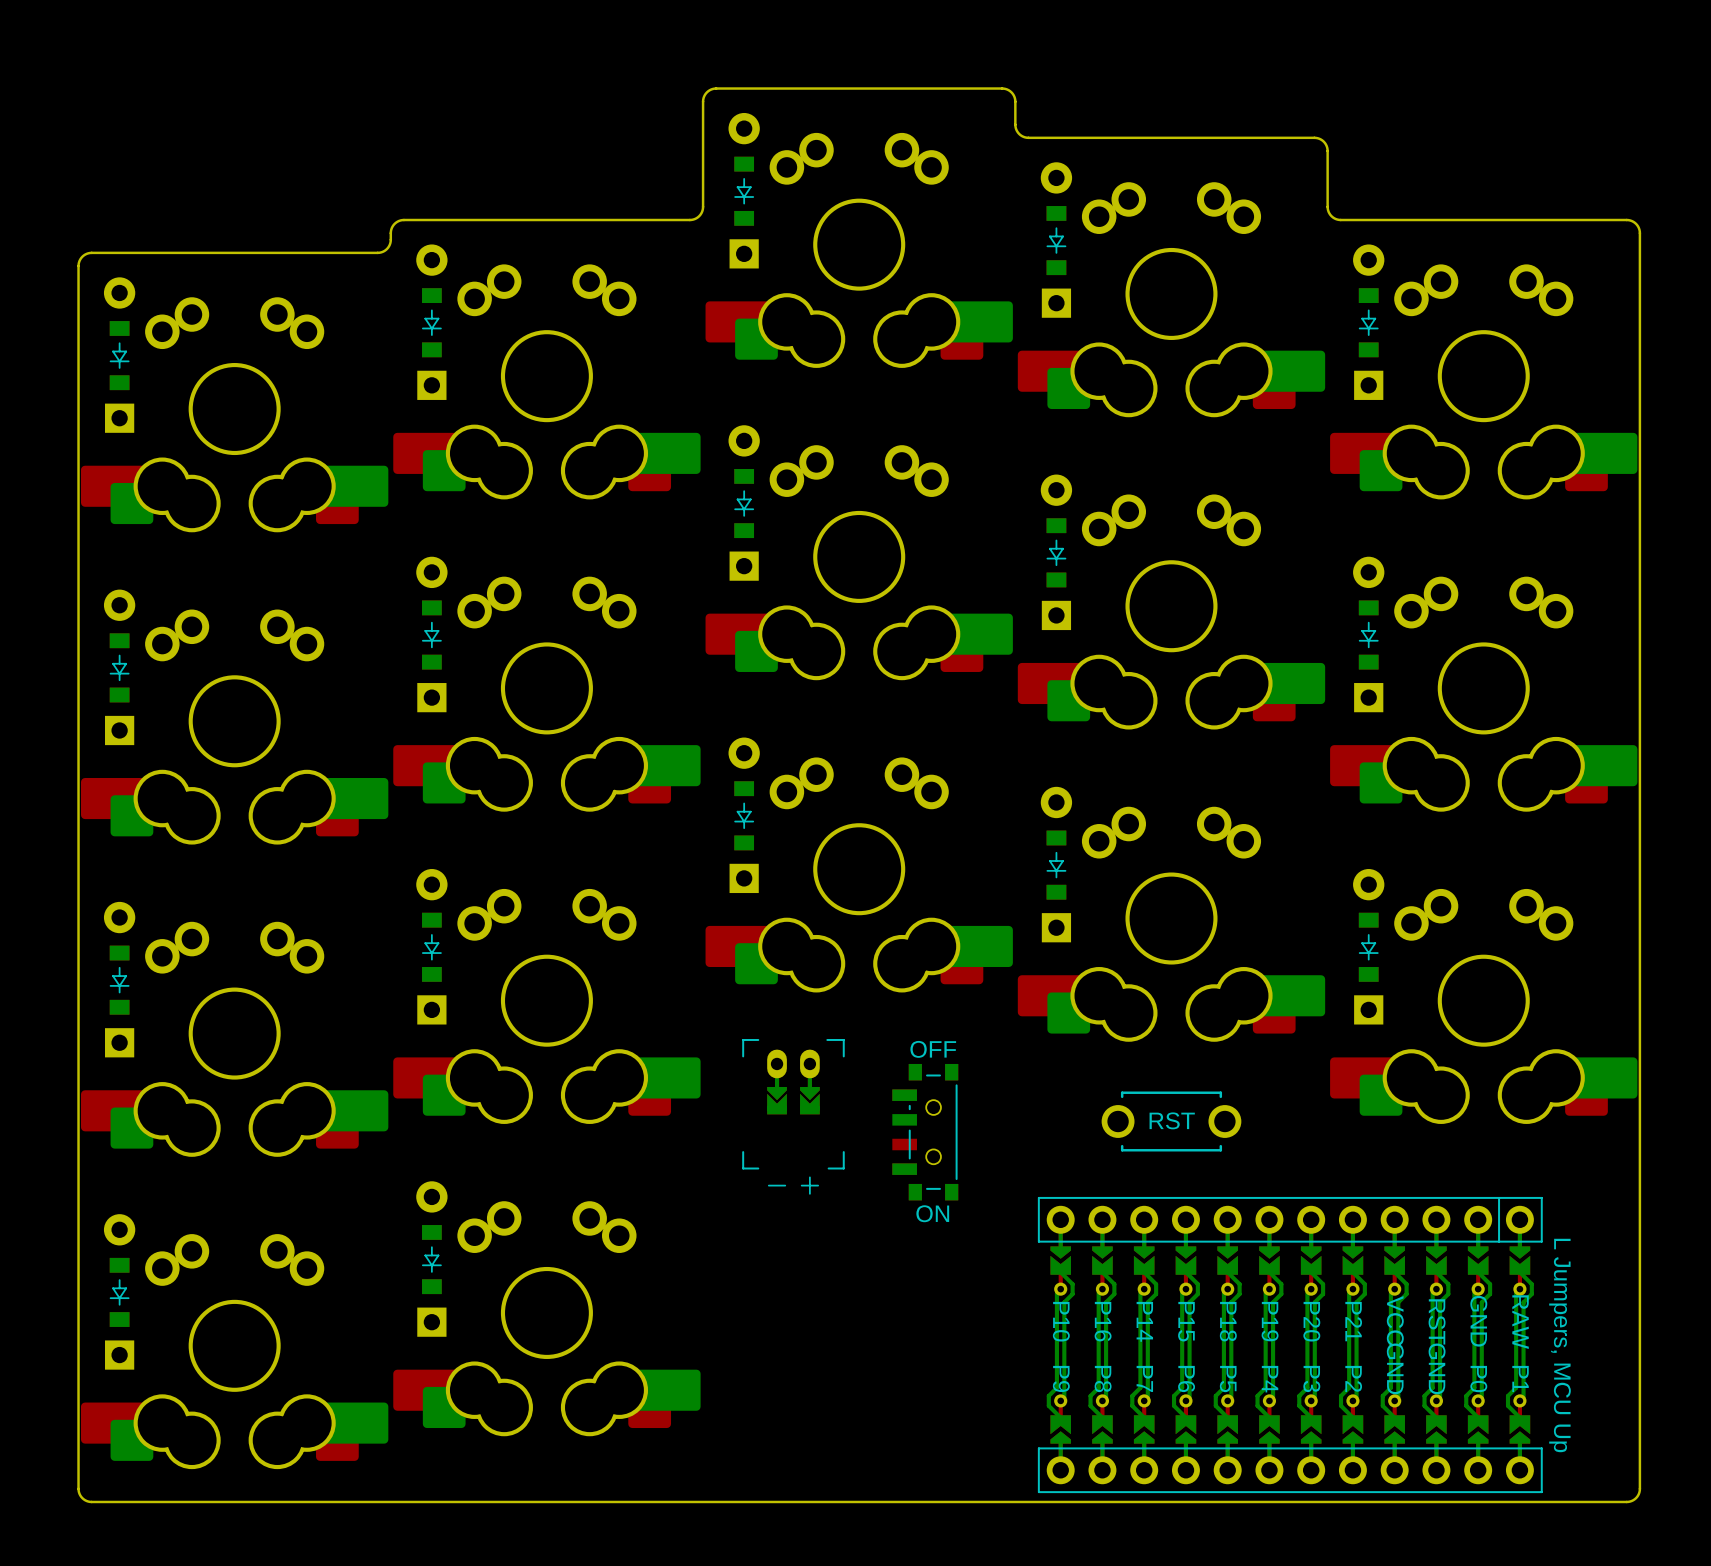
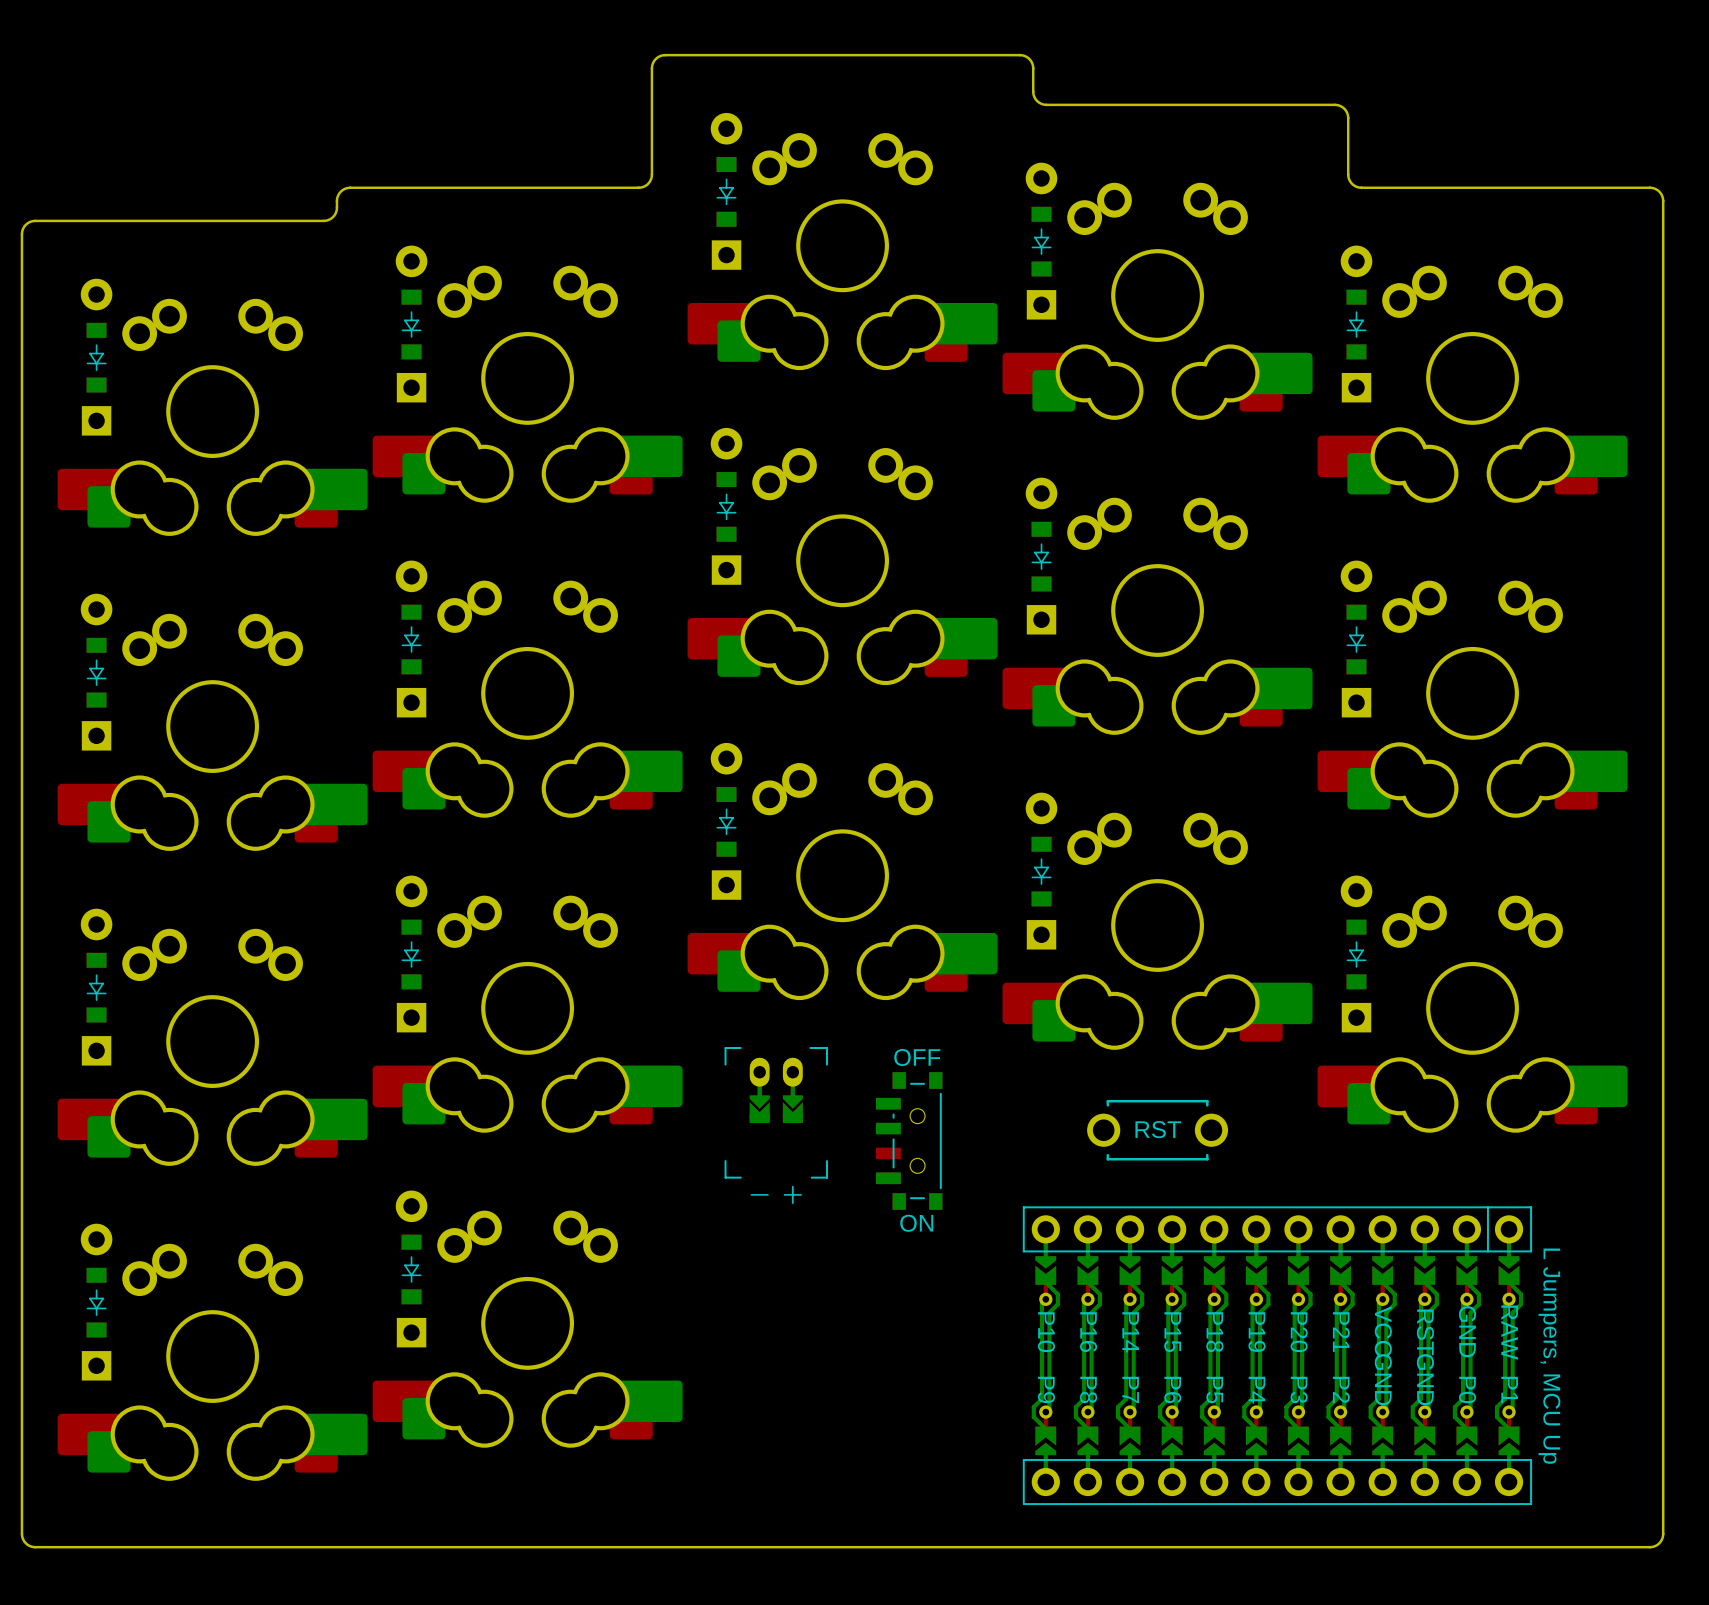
board edge: (1002, 88) (711, 89) (705, 93) (703, 99) (702, 208) (699, 216) (691, 219) (403, 220) (393, 225) (389, 246) (379, 252) (91, 252) (85, 254) (80, 259) (78, 266) (78, 1488) (80, 1495) (85, 1500) (91, 1501) (1626, 1501) (1633, 1500) (1638, 1495) (1639, 1488) (1638, 228) (1633, 221) (1626, 220) (1337, 219) (1331, 216) (1328, 210) (1327, 149) (1324, 142) (1319, 138) (1026, 137) (1019, 133) (1015, 128) (1013, 95) (1008, 90) (1002, 88) -> (1019, 55) (1026, 56) (1031, 61) (1033, 95) (1037, 100) (1044, 104) (1340, 105) (1345, 110) (1348, 116) (1348, 177) (1352, 183) (1358, 187) (1649, 187) (1656, 189) (1662, 195) (1663, 1533) (1661, 1540) (1656, 1545) (1649, 1547) (35, 1547) (28, 1545) (23, 1540) (21, 1533) (21, 234) (23, 227) (28, 222) (35, 220) (325, 220) (335, 214) (339, 192) (350, 187) (640, 187) (648, 183) (651, 176) (652, 66) (654, 60) (660, 56) (1019, 55)

